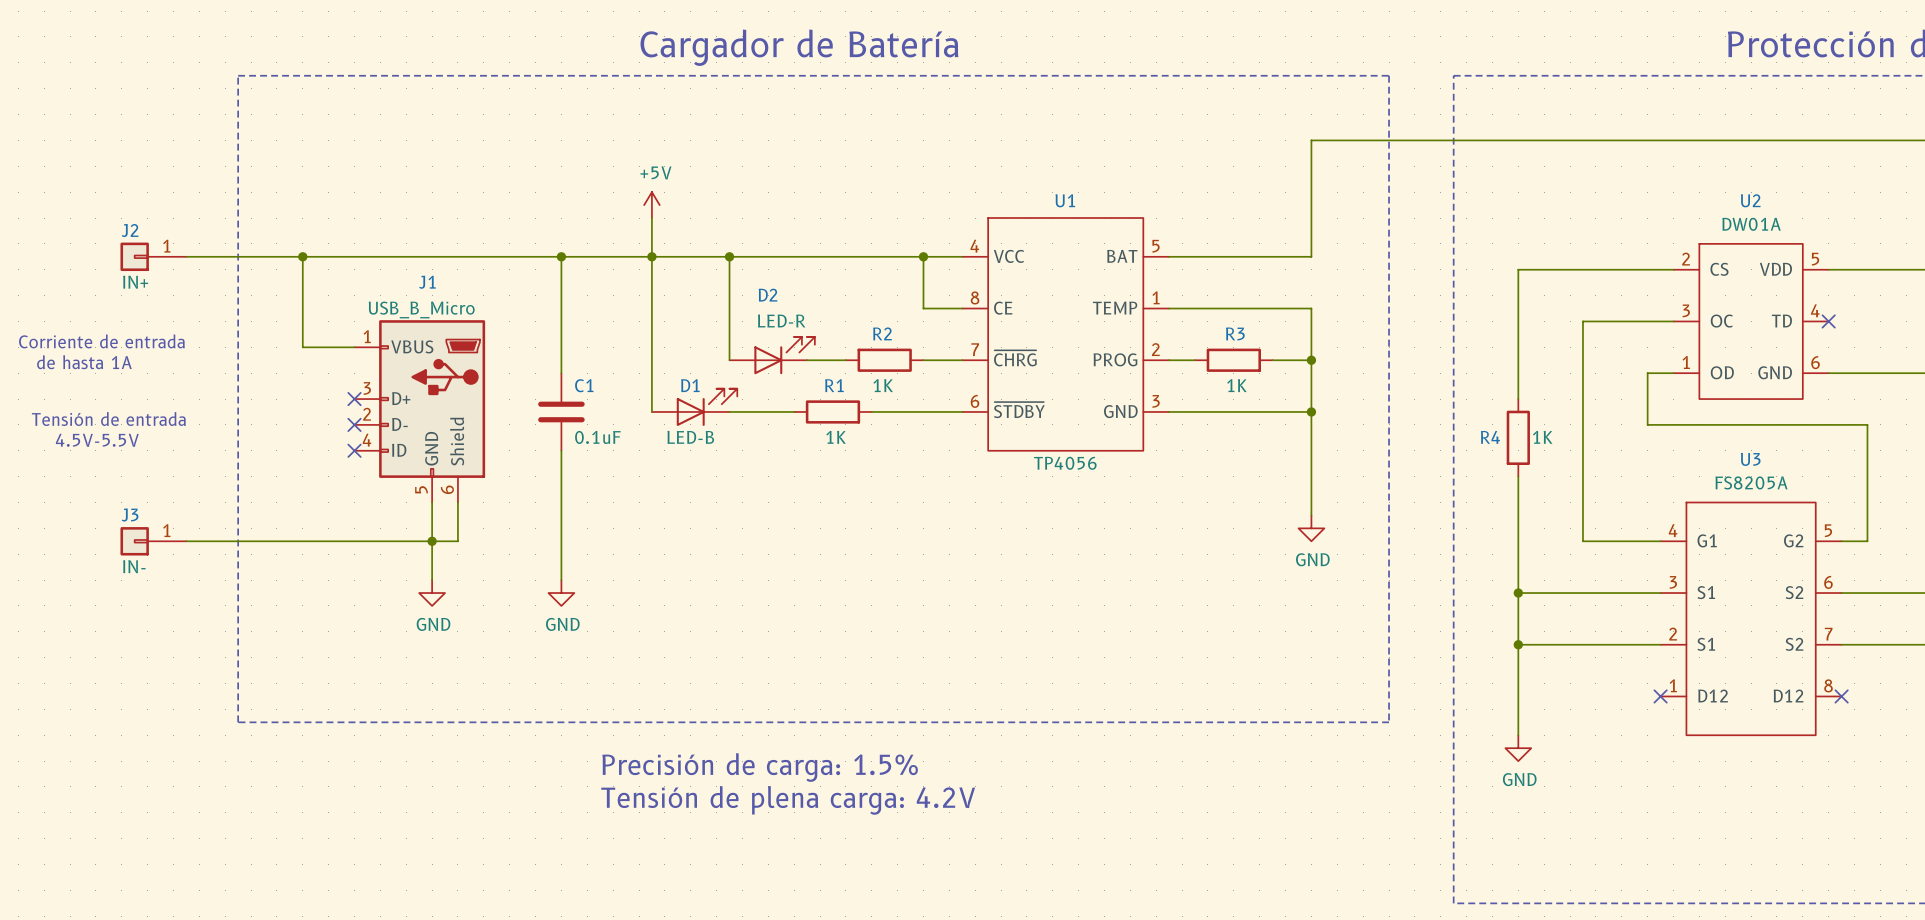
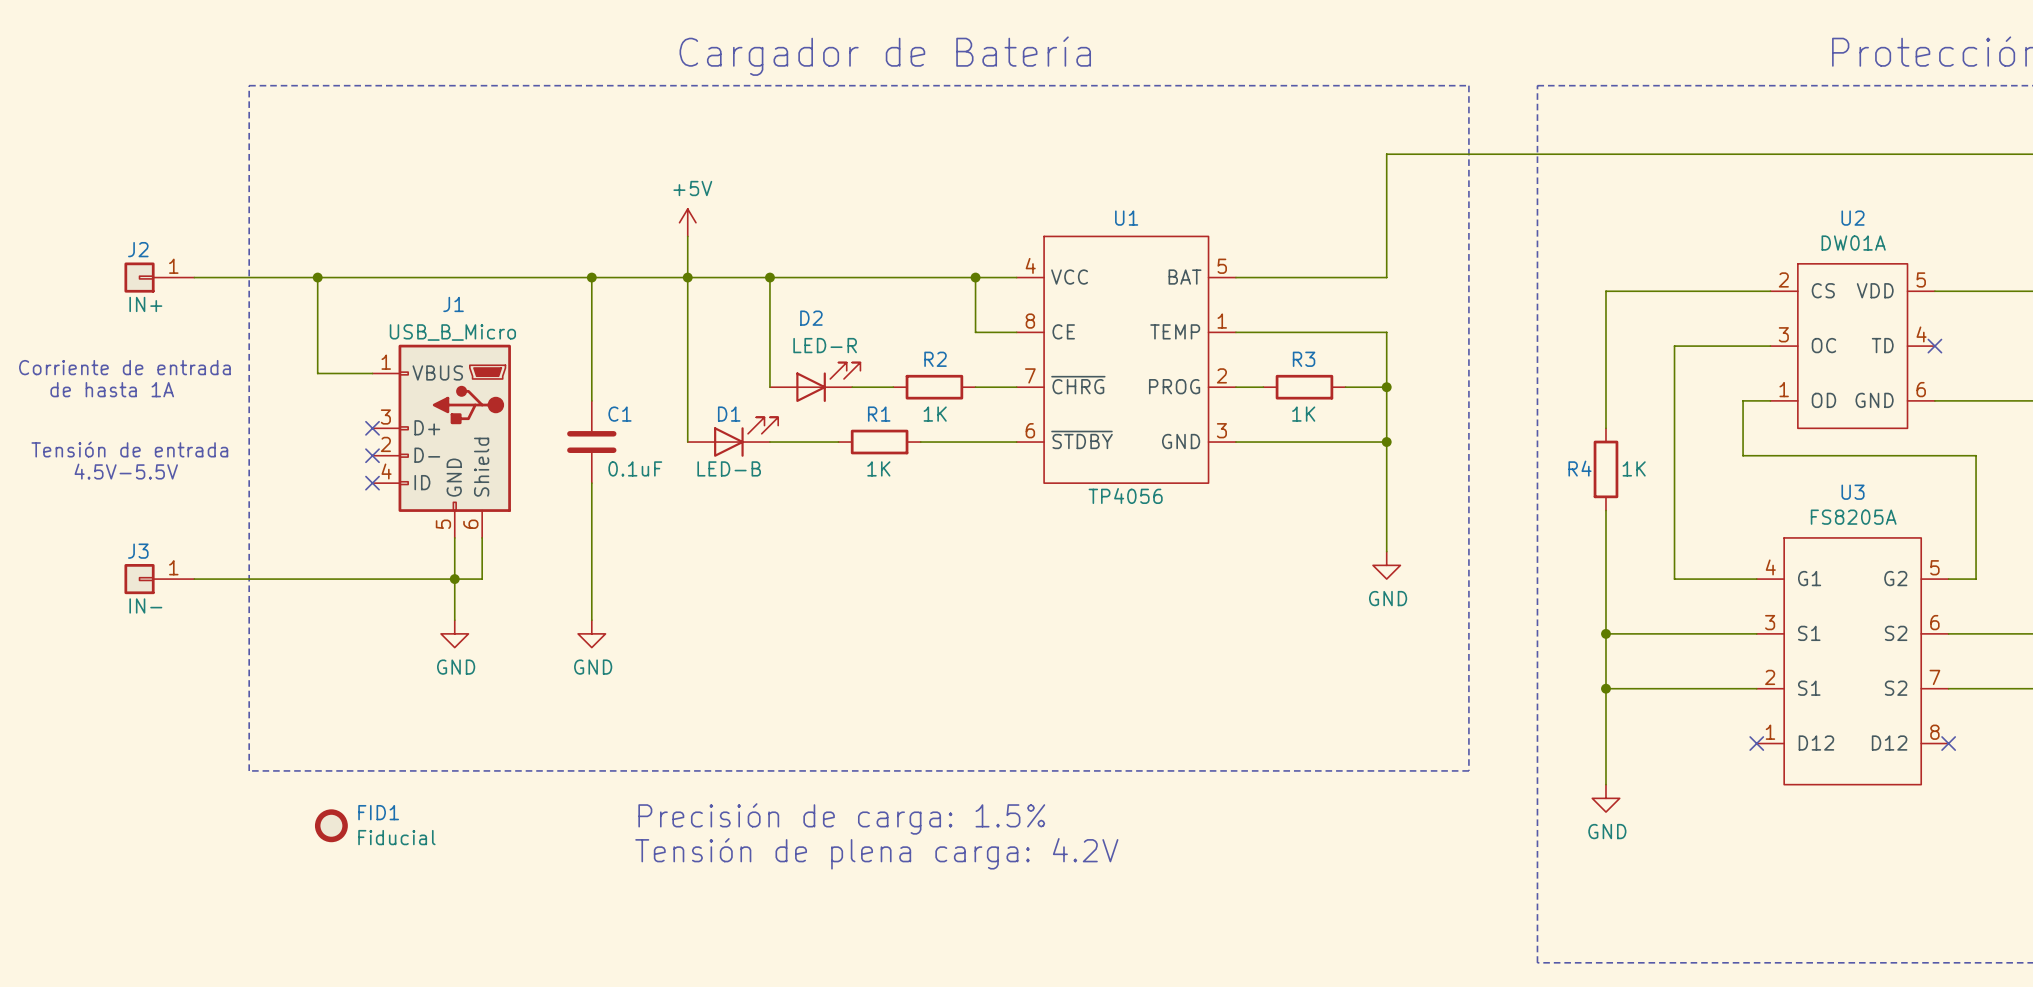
FID1: none -> Fiducial (331, 825)

